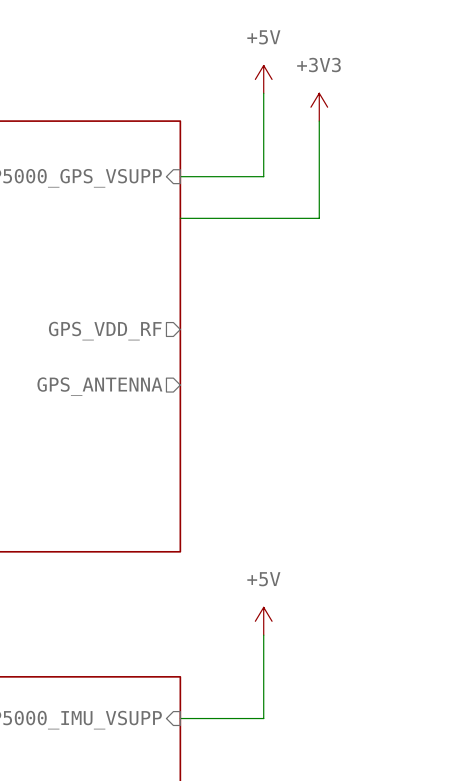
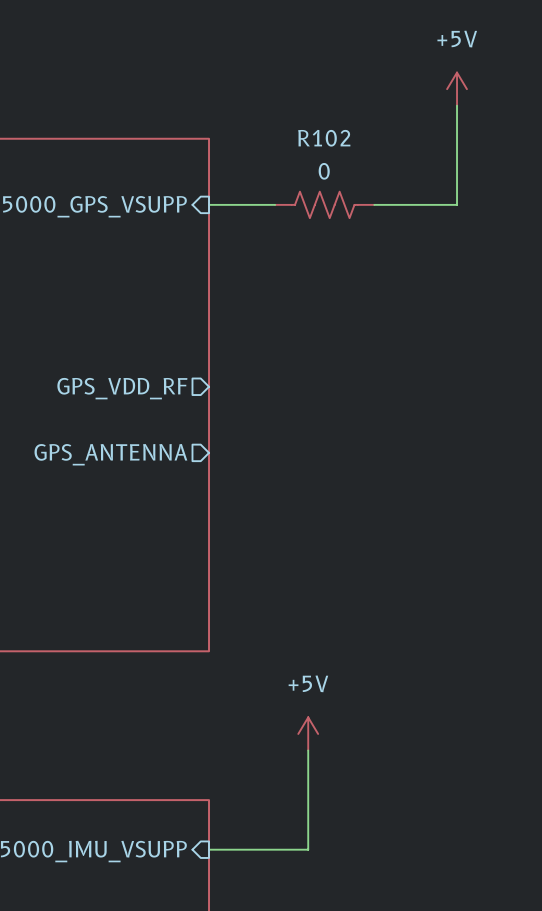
power symbol position: +5V (263, 79) -> +5V (457, 89)
wire: (263, 93) (263, 176) (235, 176) -> none
wire: none -> (457, 105) (457, 204) (374, 204)
power symbol: +3V3 (319, 107) -> none
wire: (319, 121) (319, 218) (180, 218) -> none
R102: none -> 0 (324, 204)

